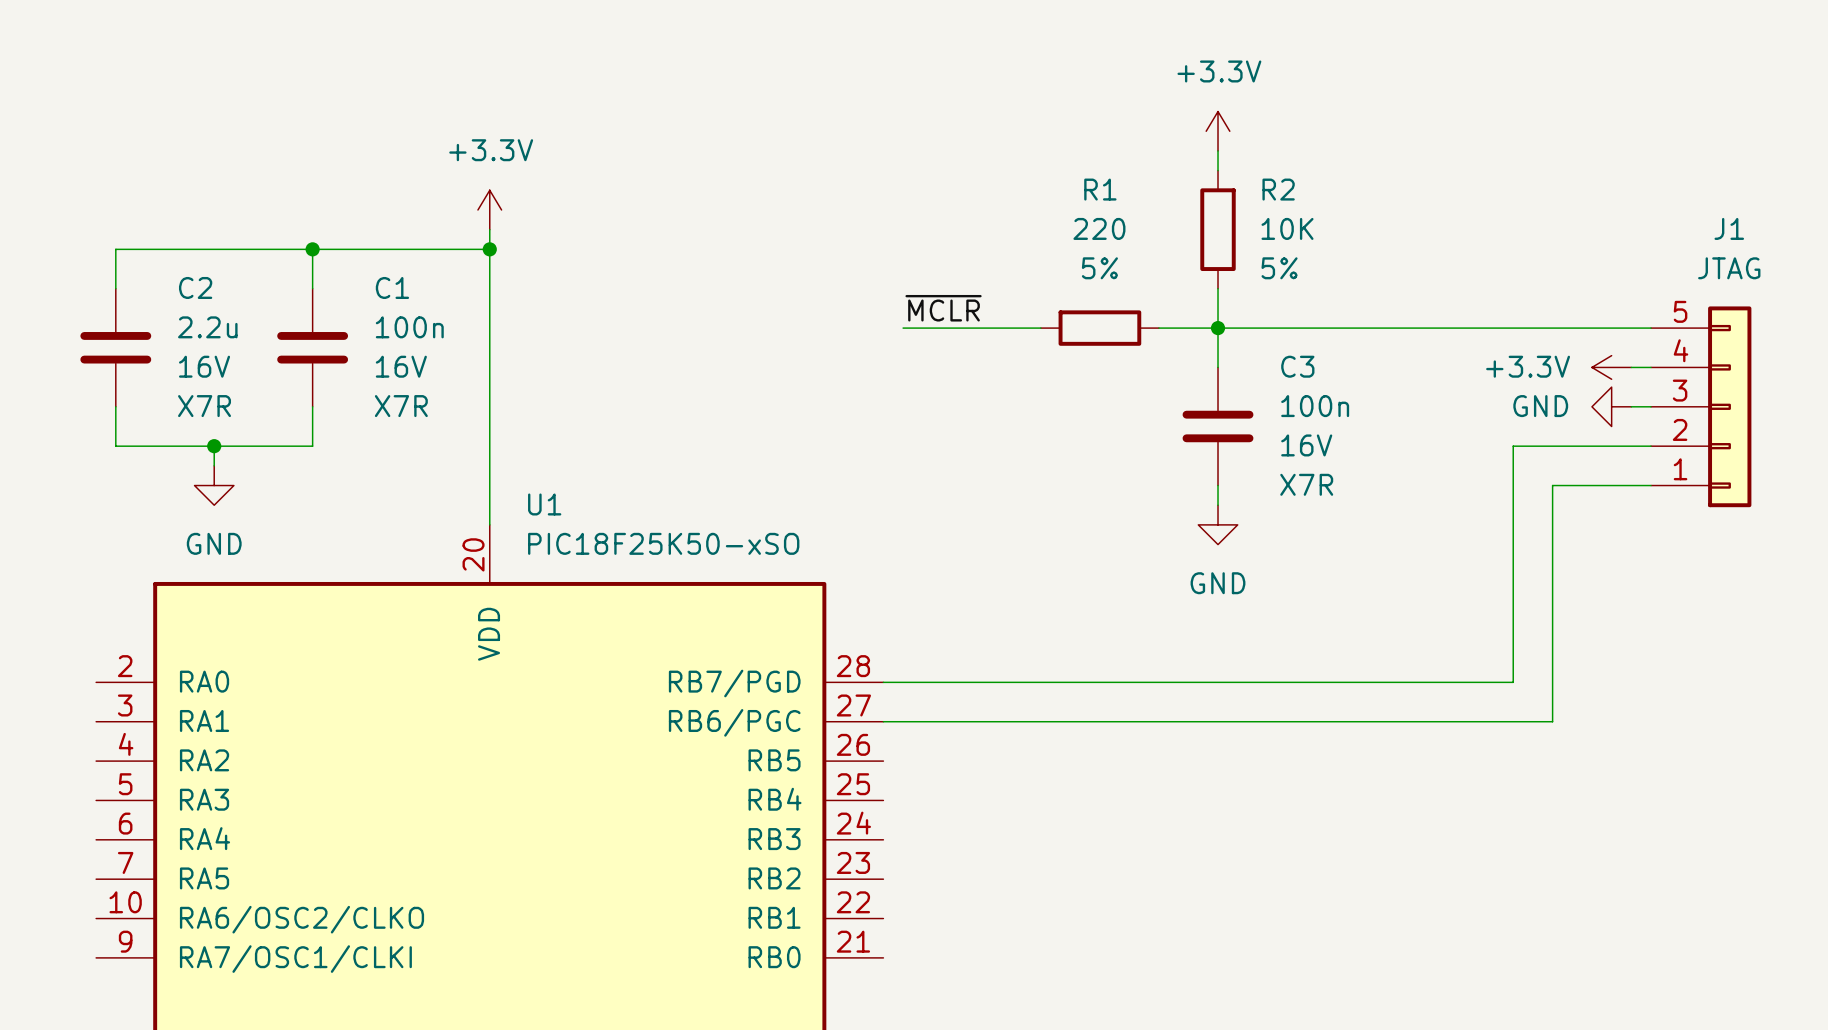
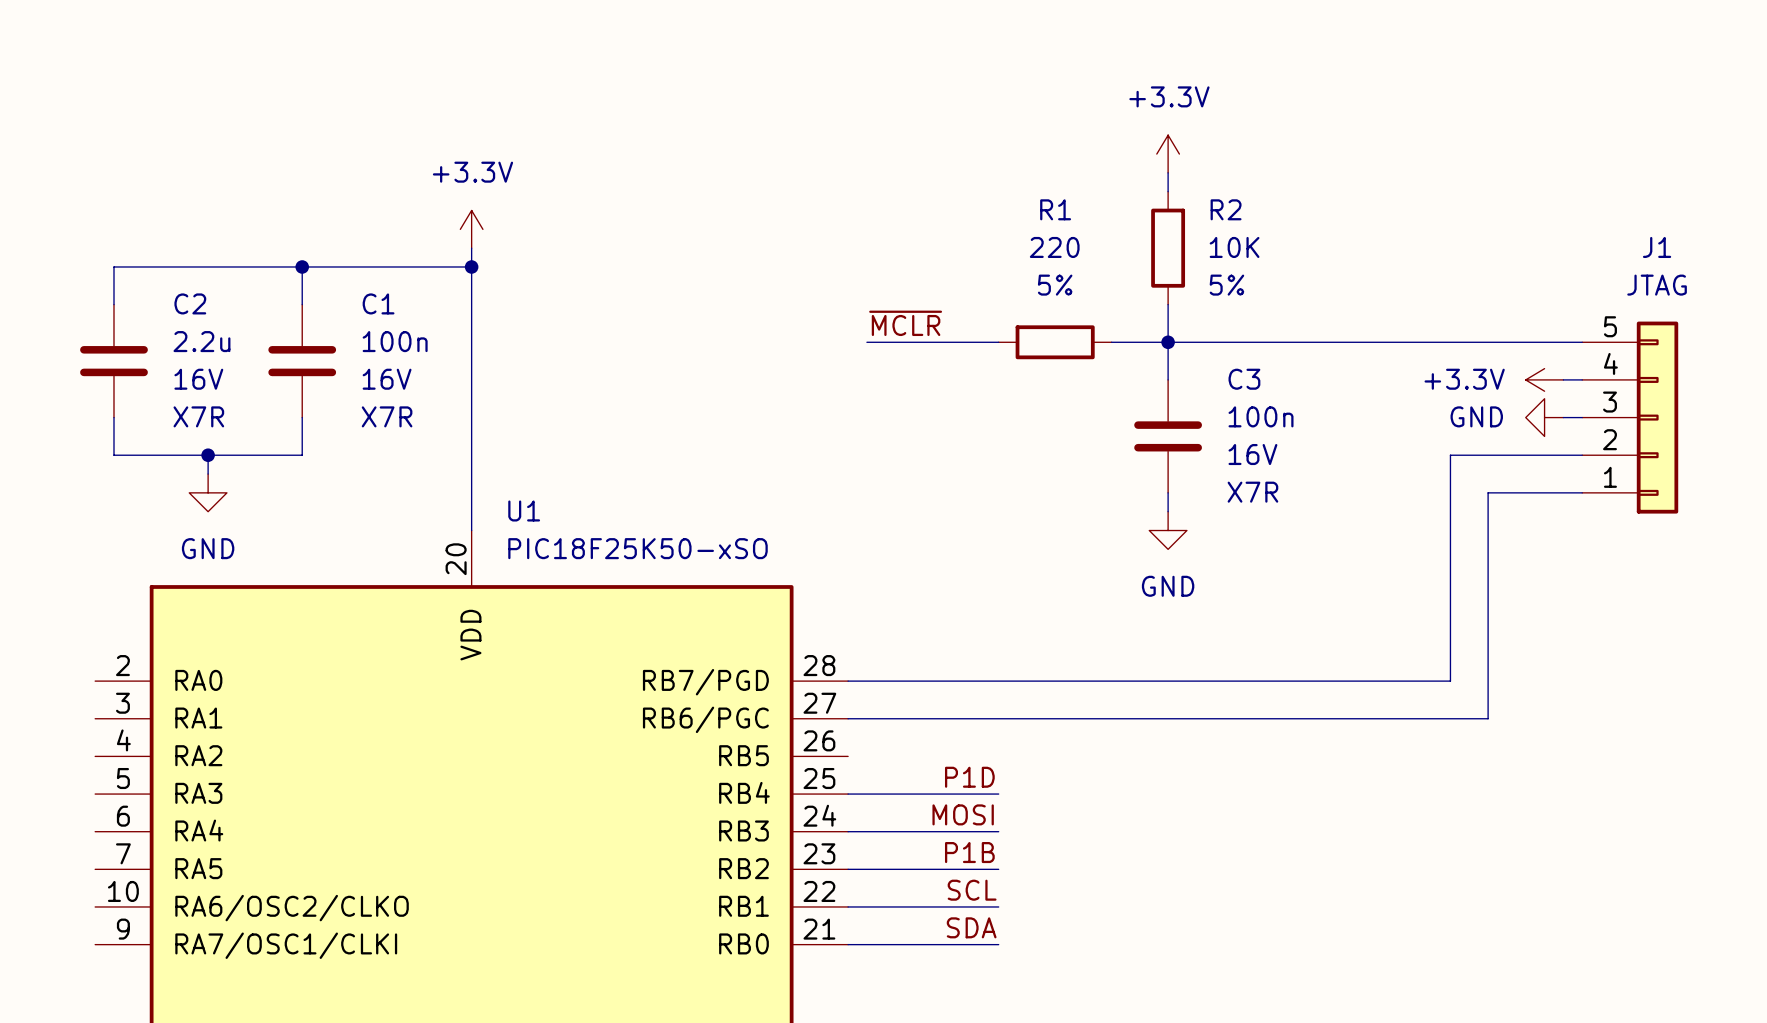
label: none -> P1D (969, 777)
wire: none -> (848, 794) (998, 794)
label: none -> MOSI (963, 814)
wire: none -> (848, 831) (998, 831)
label: none -> P1B (969, 852)
wire: none -> (848, 869) (998, 869)
label: none -> SCL (972, 890)
wire: none -> (848, 906) (998, 906)
label: none -> SDA (971, 927)
wire: none -> (848, 944) (998, 944)

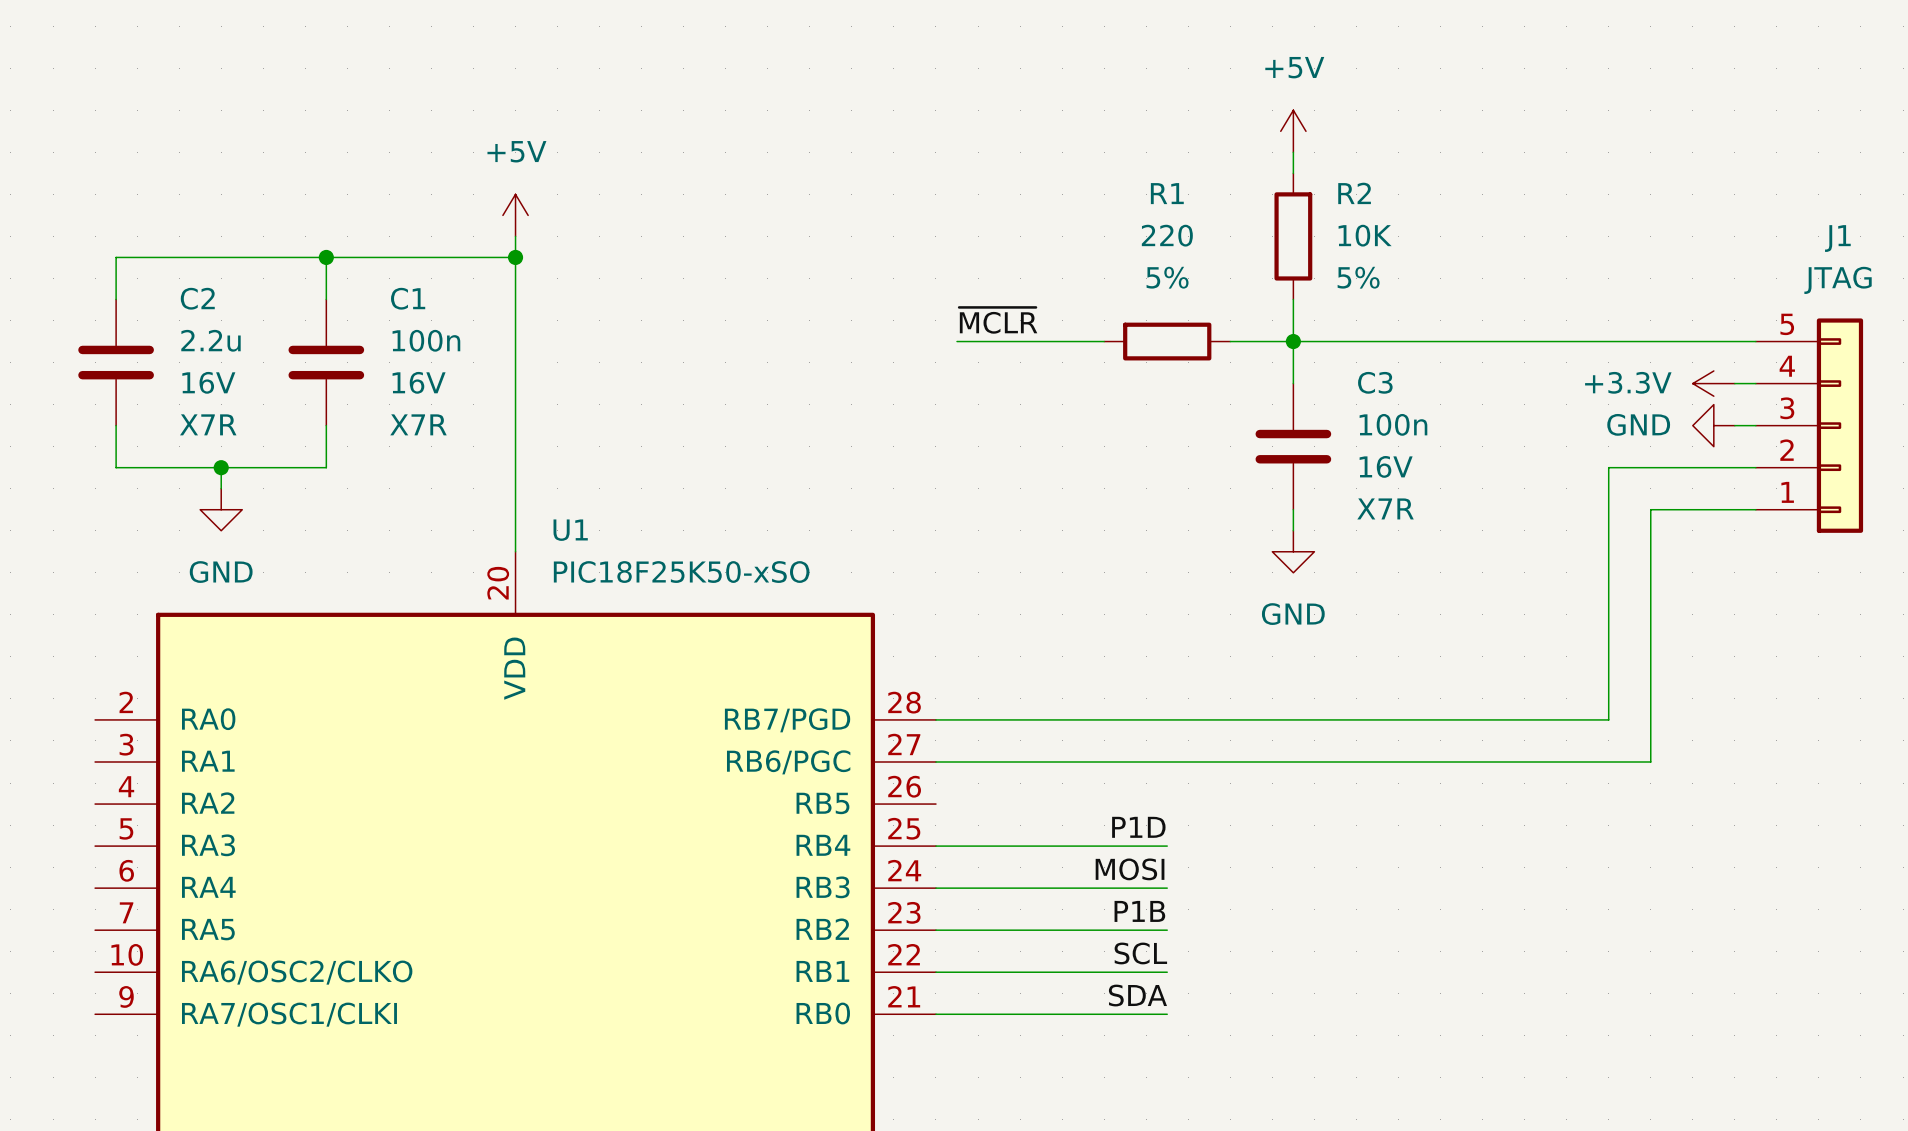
power symbol: +3.3V (1168, 154) -> +5V (1293, 131)
power symbol: +3.3V (471, 229) -> +5V (515, 215)
label position: P1D (969, 777) -> P1D (1138, 827)
wire: none -> (1104, 846) (1167, 846)
label position: MOSI (963, 814) -> MOSI (1130, 869)
wire: none -> (1104, 888) (1167, 888)
label position: P1B (969, 852) -> P1B (1139, 911)
wire: none -> (1104, 930) (1167, 930)
label position: SCL (972, 890) -> SCL (1140, 953)
wire: none -> (1104, 972) (1167, 972)
label position: SDA (971, 927) -> SDA (1137, 995)
wire: none -> (1104, 1014) (1167, 1014)

